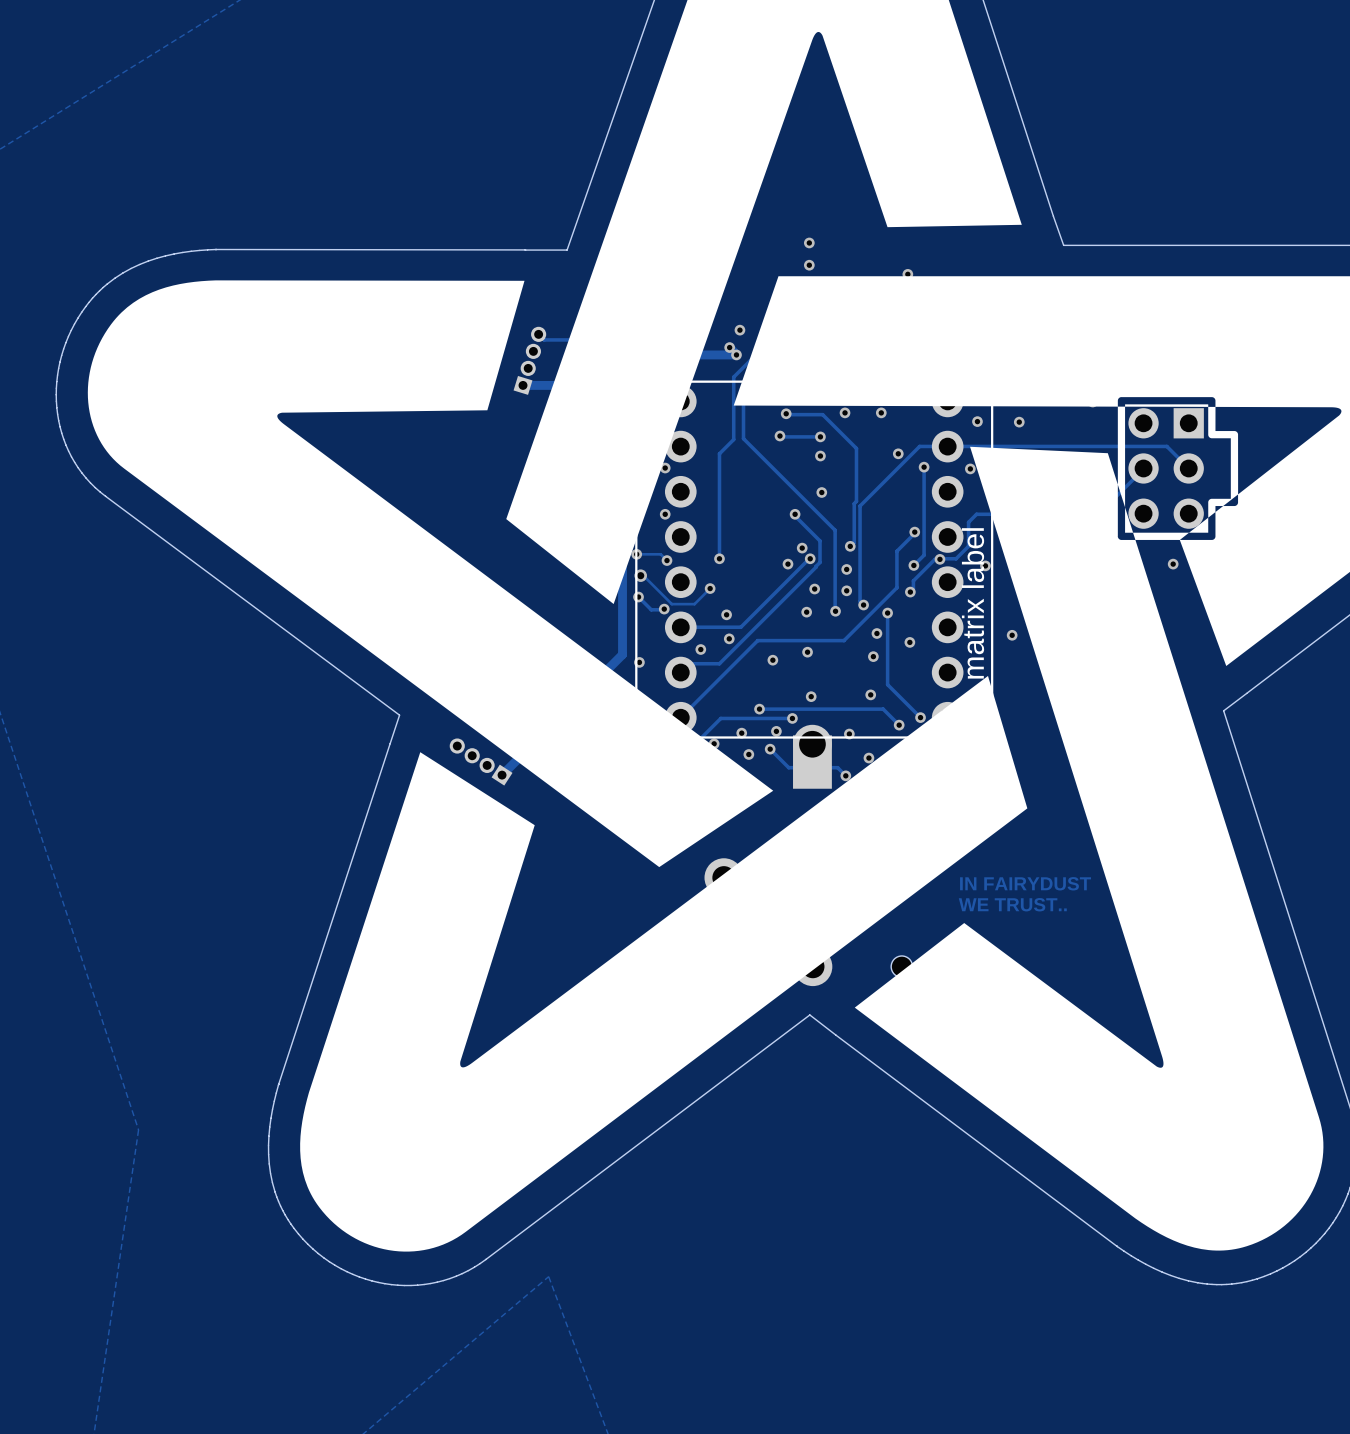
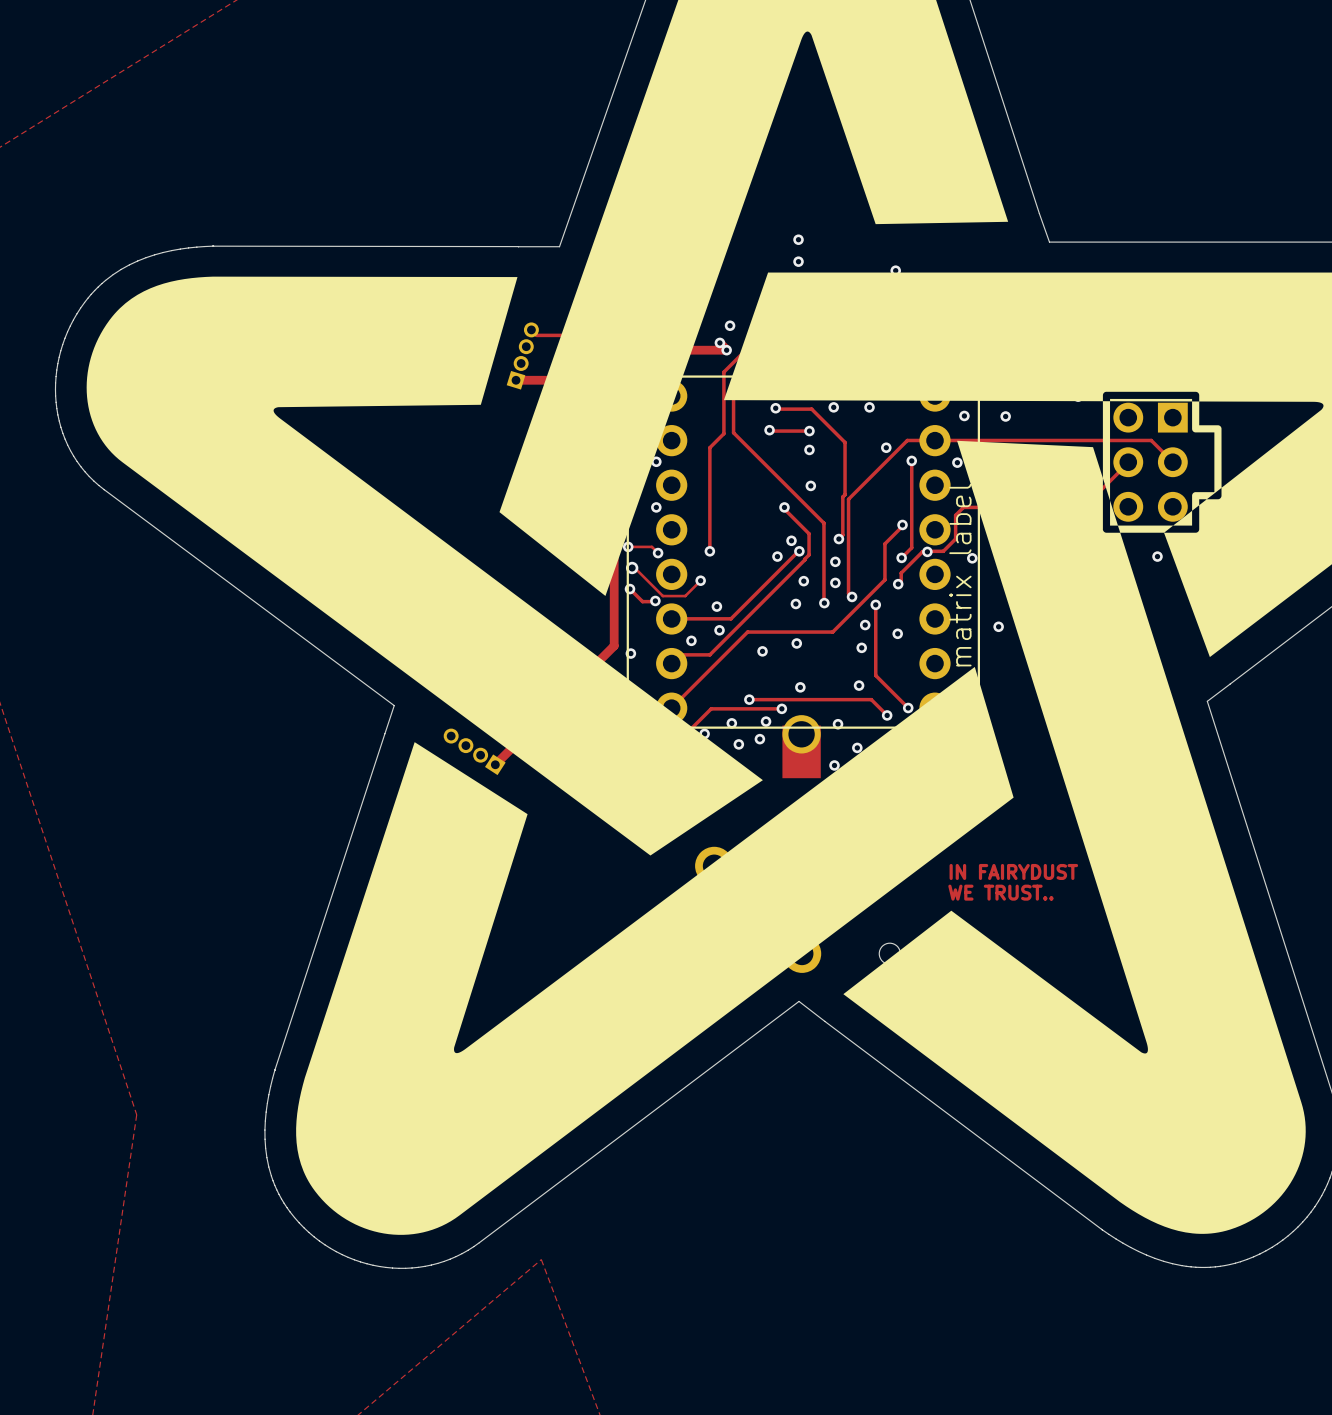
track: (770, 749) (788, 767) (837, 767) (845, 775) -> none

